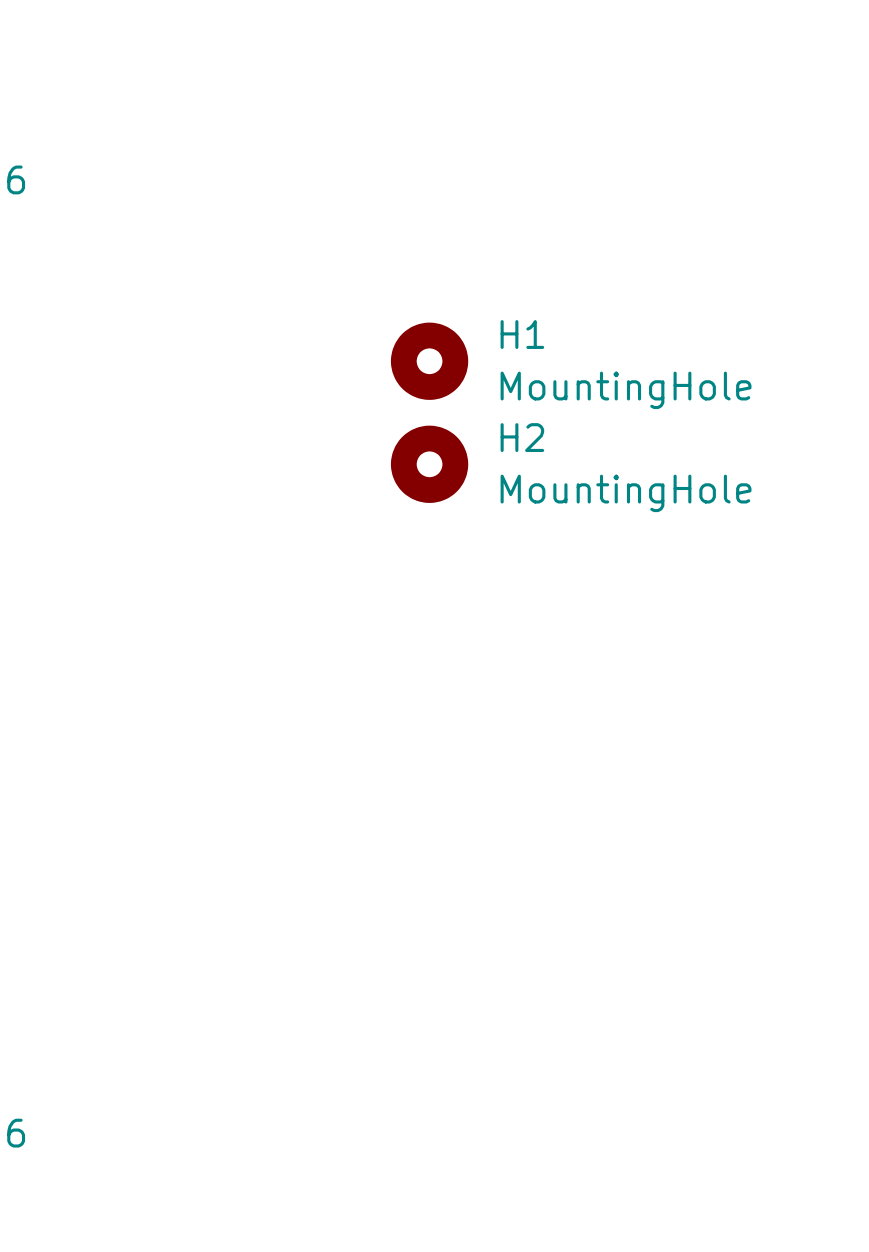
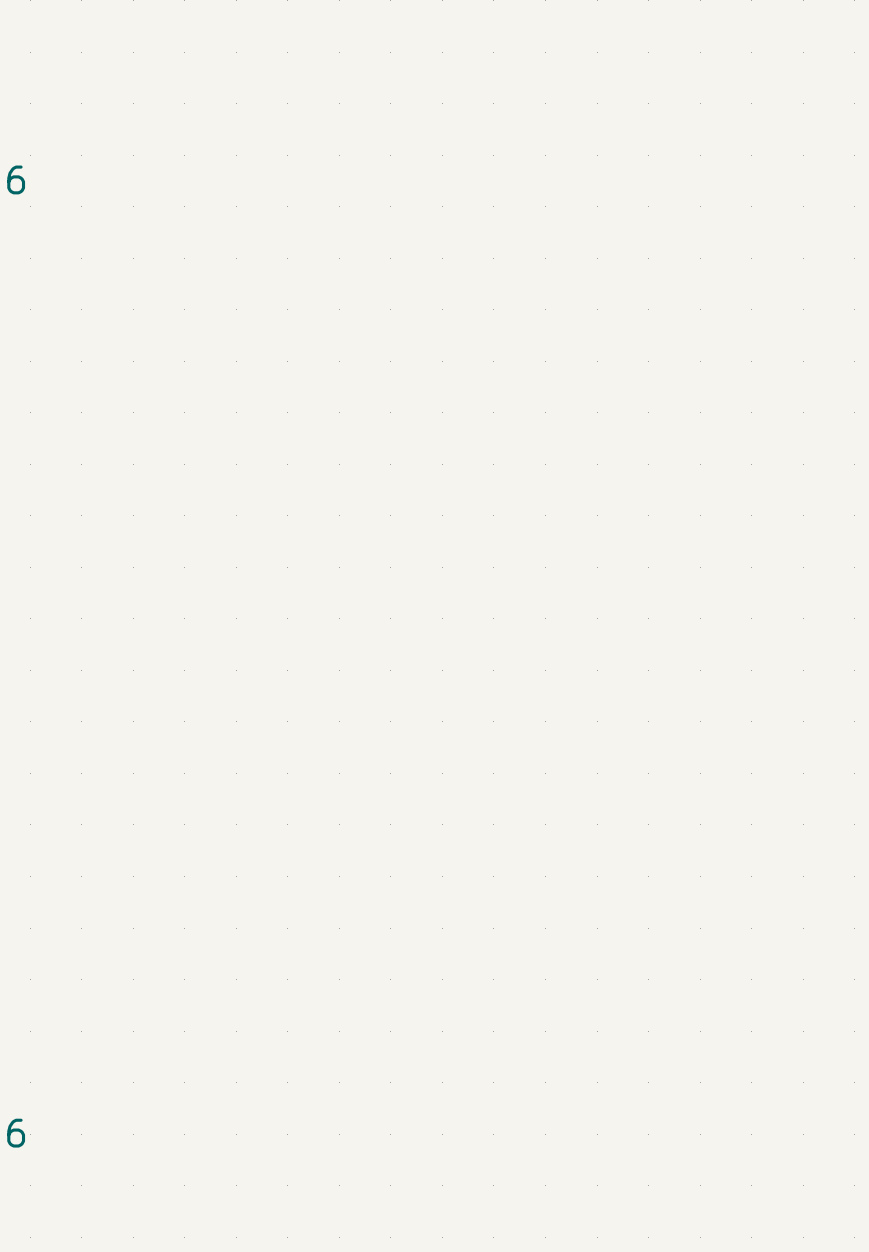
H1: MountingHole (429, 361) -> none
H2: MountingHole (429, 464) -> none

